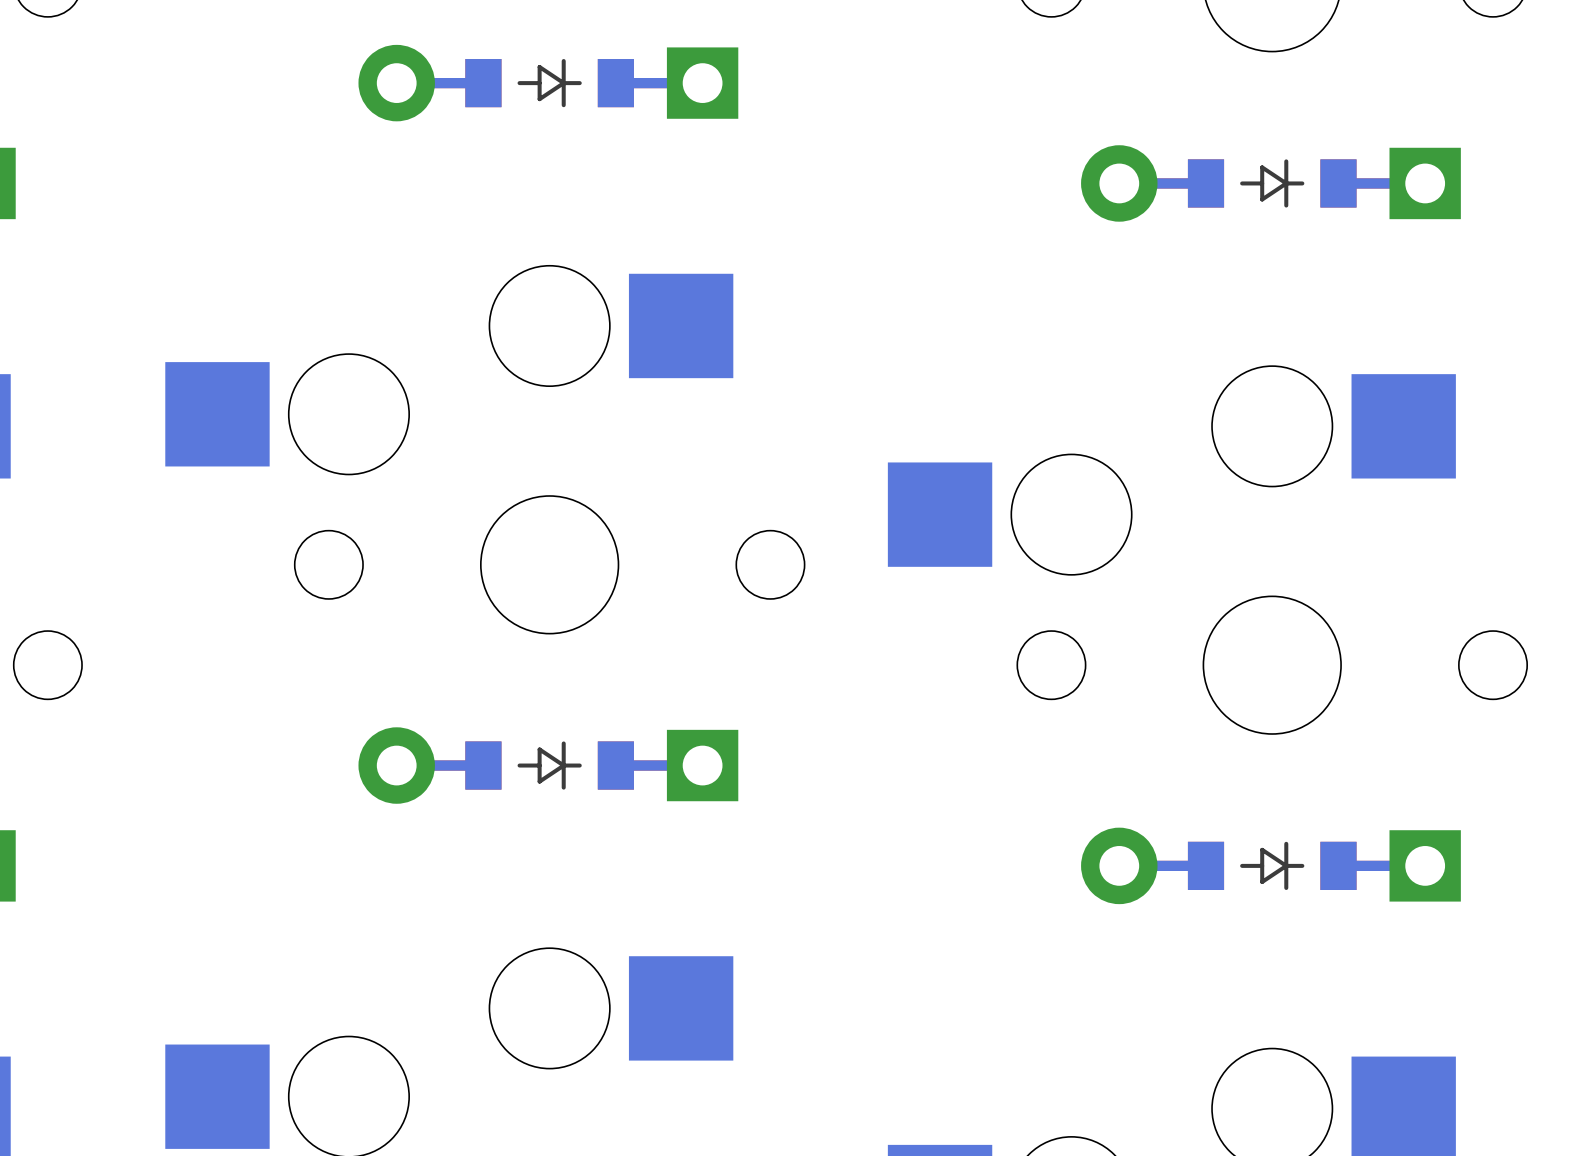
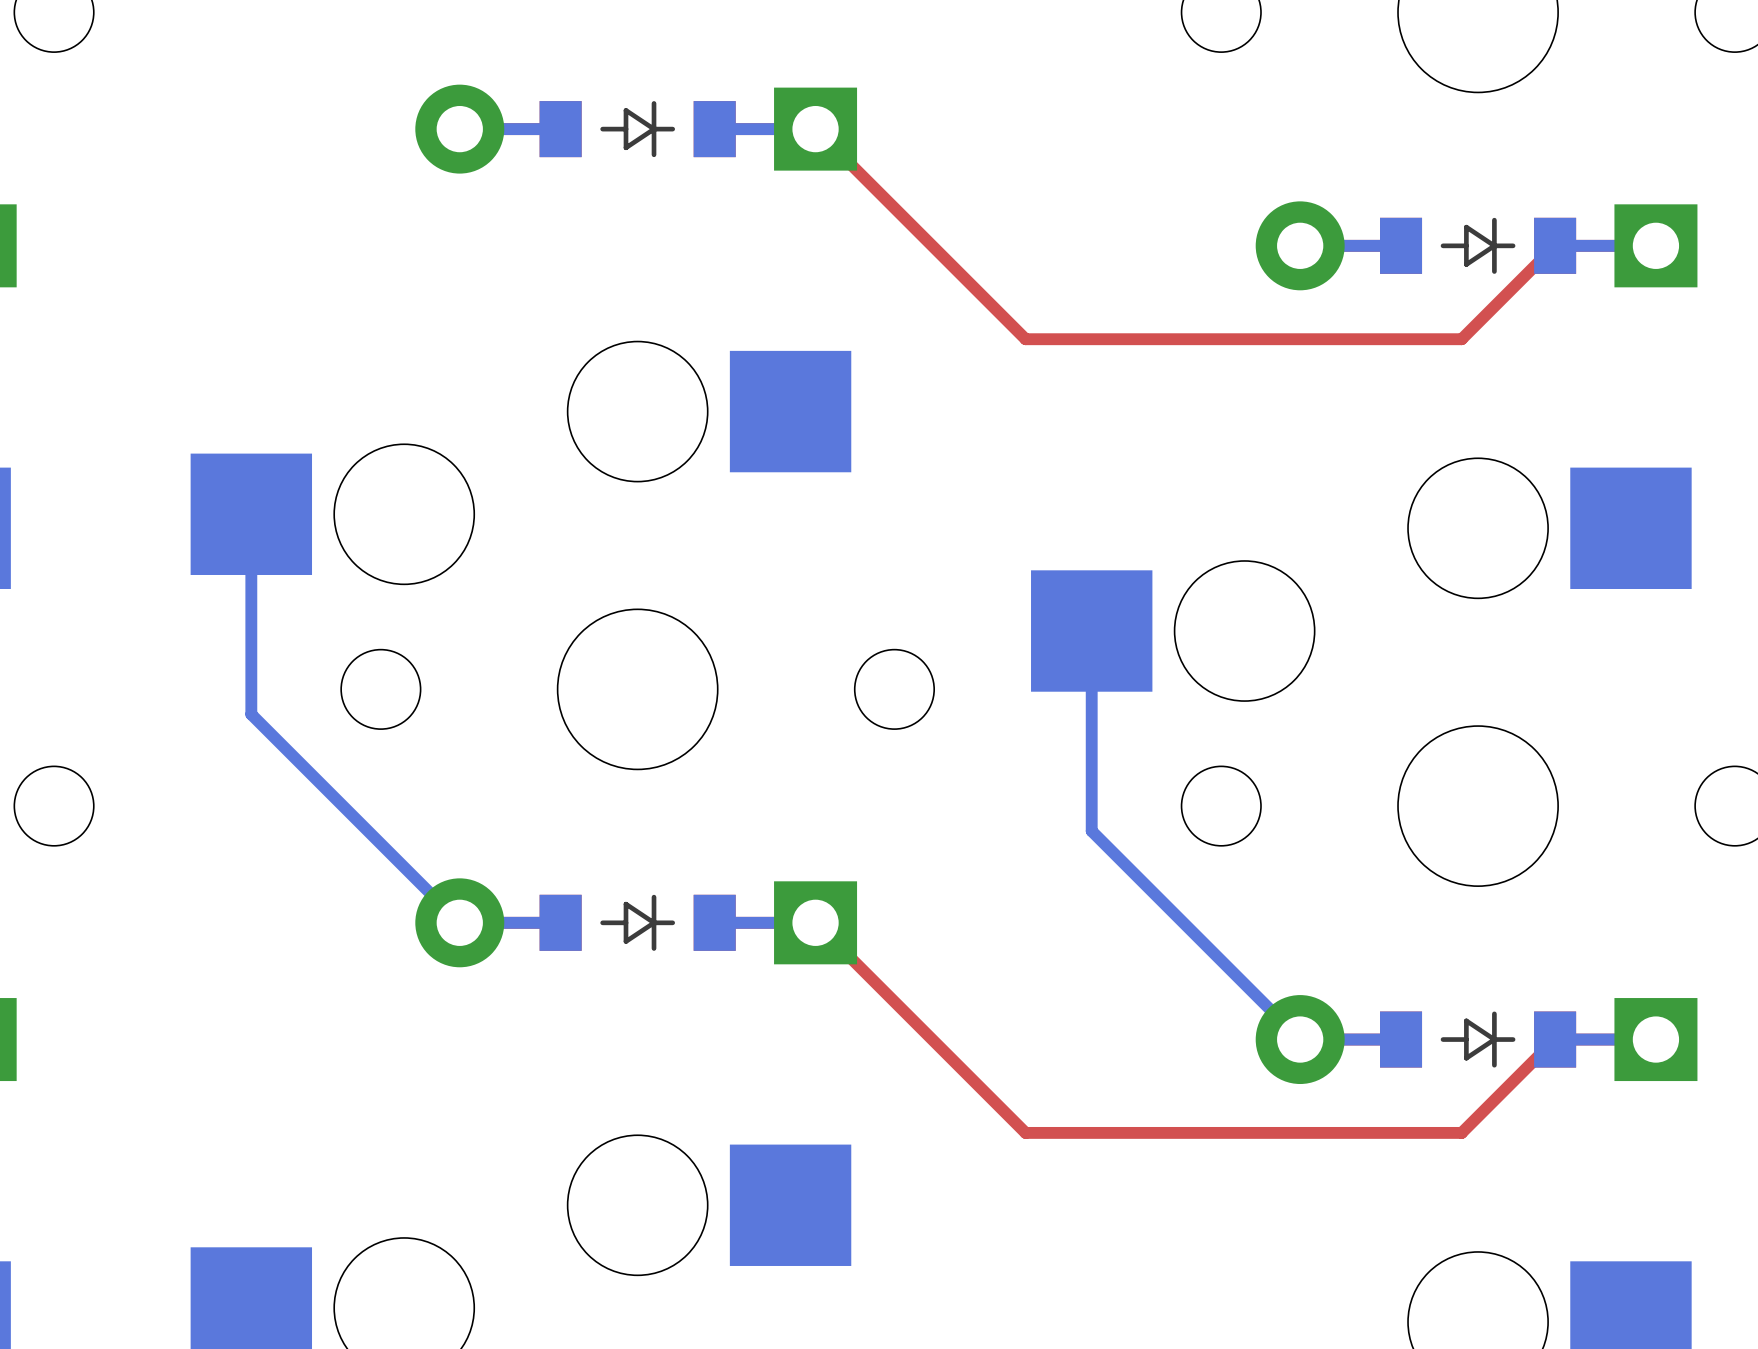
top track: none -> (815, 129) (1025, 339) (1461, 339) (1555, 245)
bottom track: none -> (251, 514) (251, 714) (459, 922)
bottom track: none -> (1091, 631) (1091, 831) (1300, 1039)
top track: none -> (815, 922) (1025, 1132) (1461, 1132) (1555, 1039)

